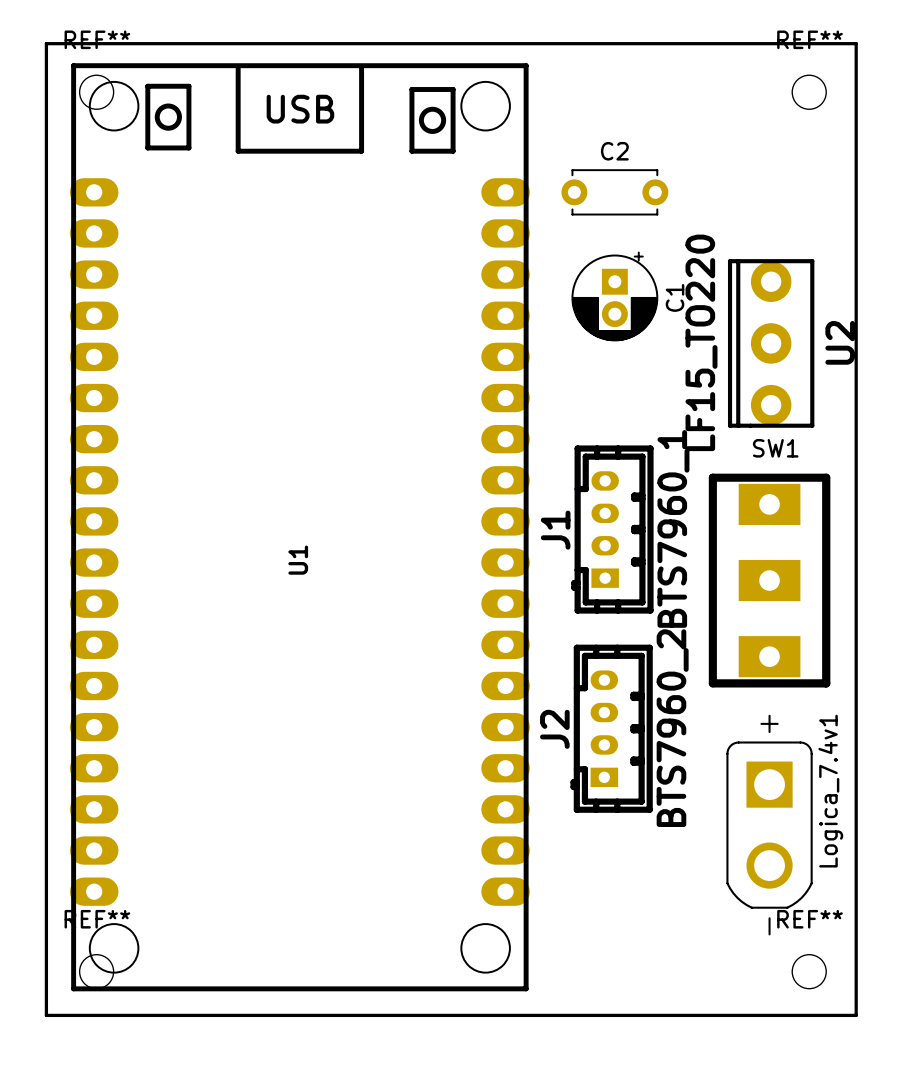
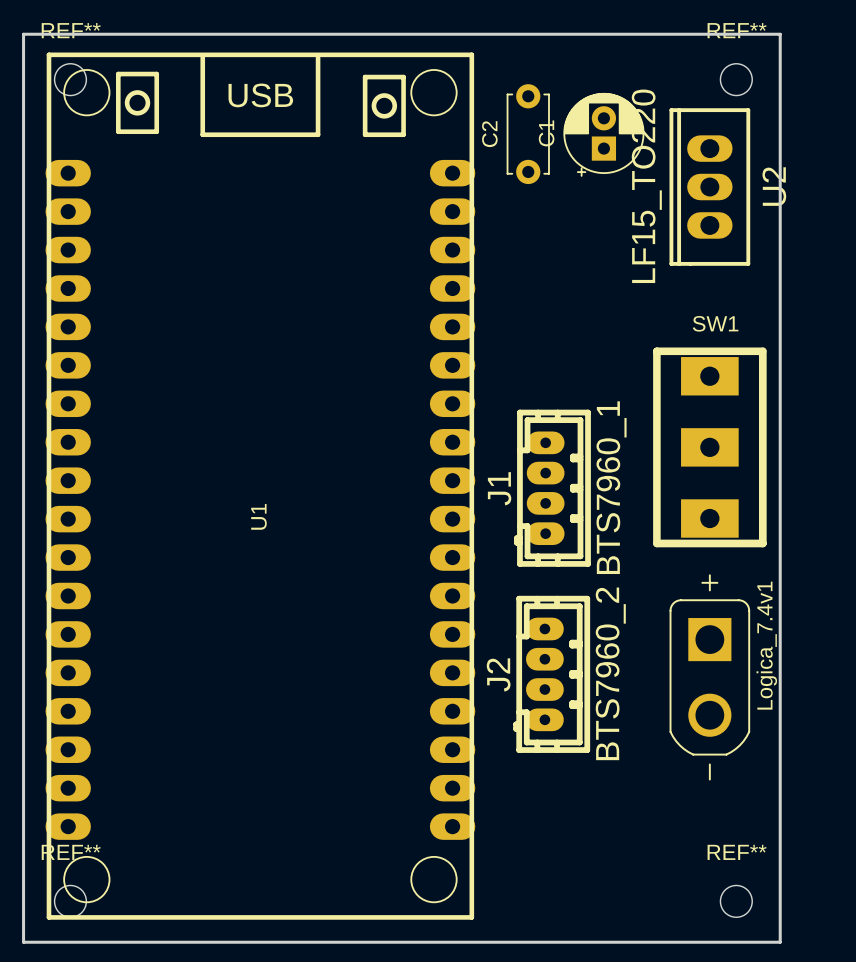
C2 name position: C2 (614, 151) -> C2 (489, 134)
C2 rotation: 0° (614, 192) -> 90° clockwise (528, 134)
U2 footprint: [727, 259, 815, 428] -> [669, 108, 751, 266]
C1 rotation: 0° (614, 296) -> 180° (603, 134)
C1 position: (614, 296) -> (603, 134)
J1 footprint: [571, 445, 654, 614] -> [514, 409, 591, 567]
SW1 position: (769, 580) -> (709, 447)
J2 footprint: [570, 644, 653, 813] -> [513, 595, 591, 753]
Logica_7.4v1 position: (769, 825) -> (709, 677)

